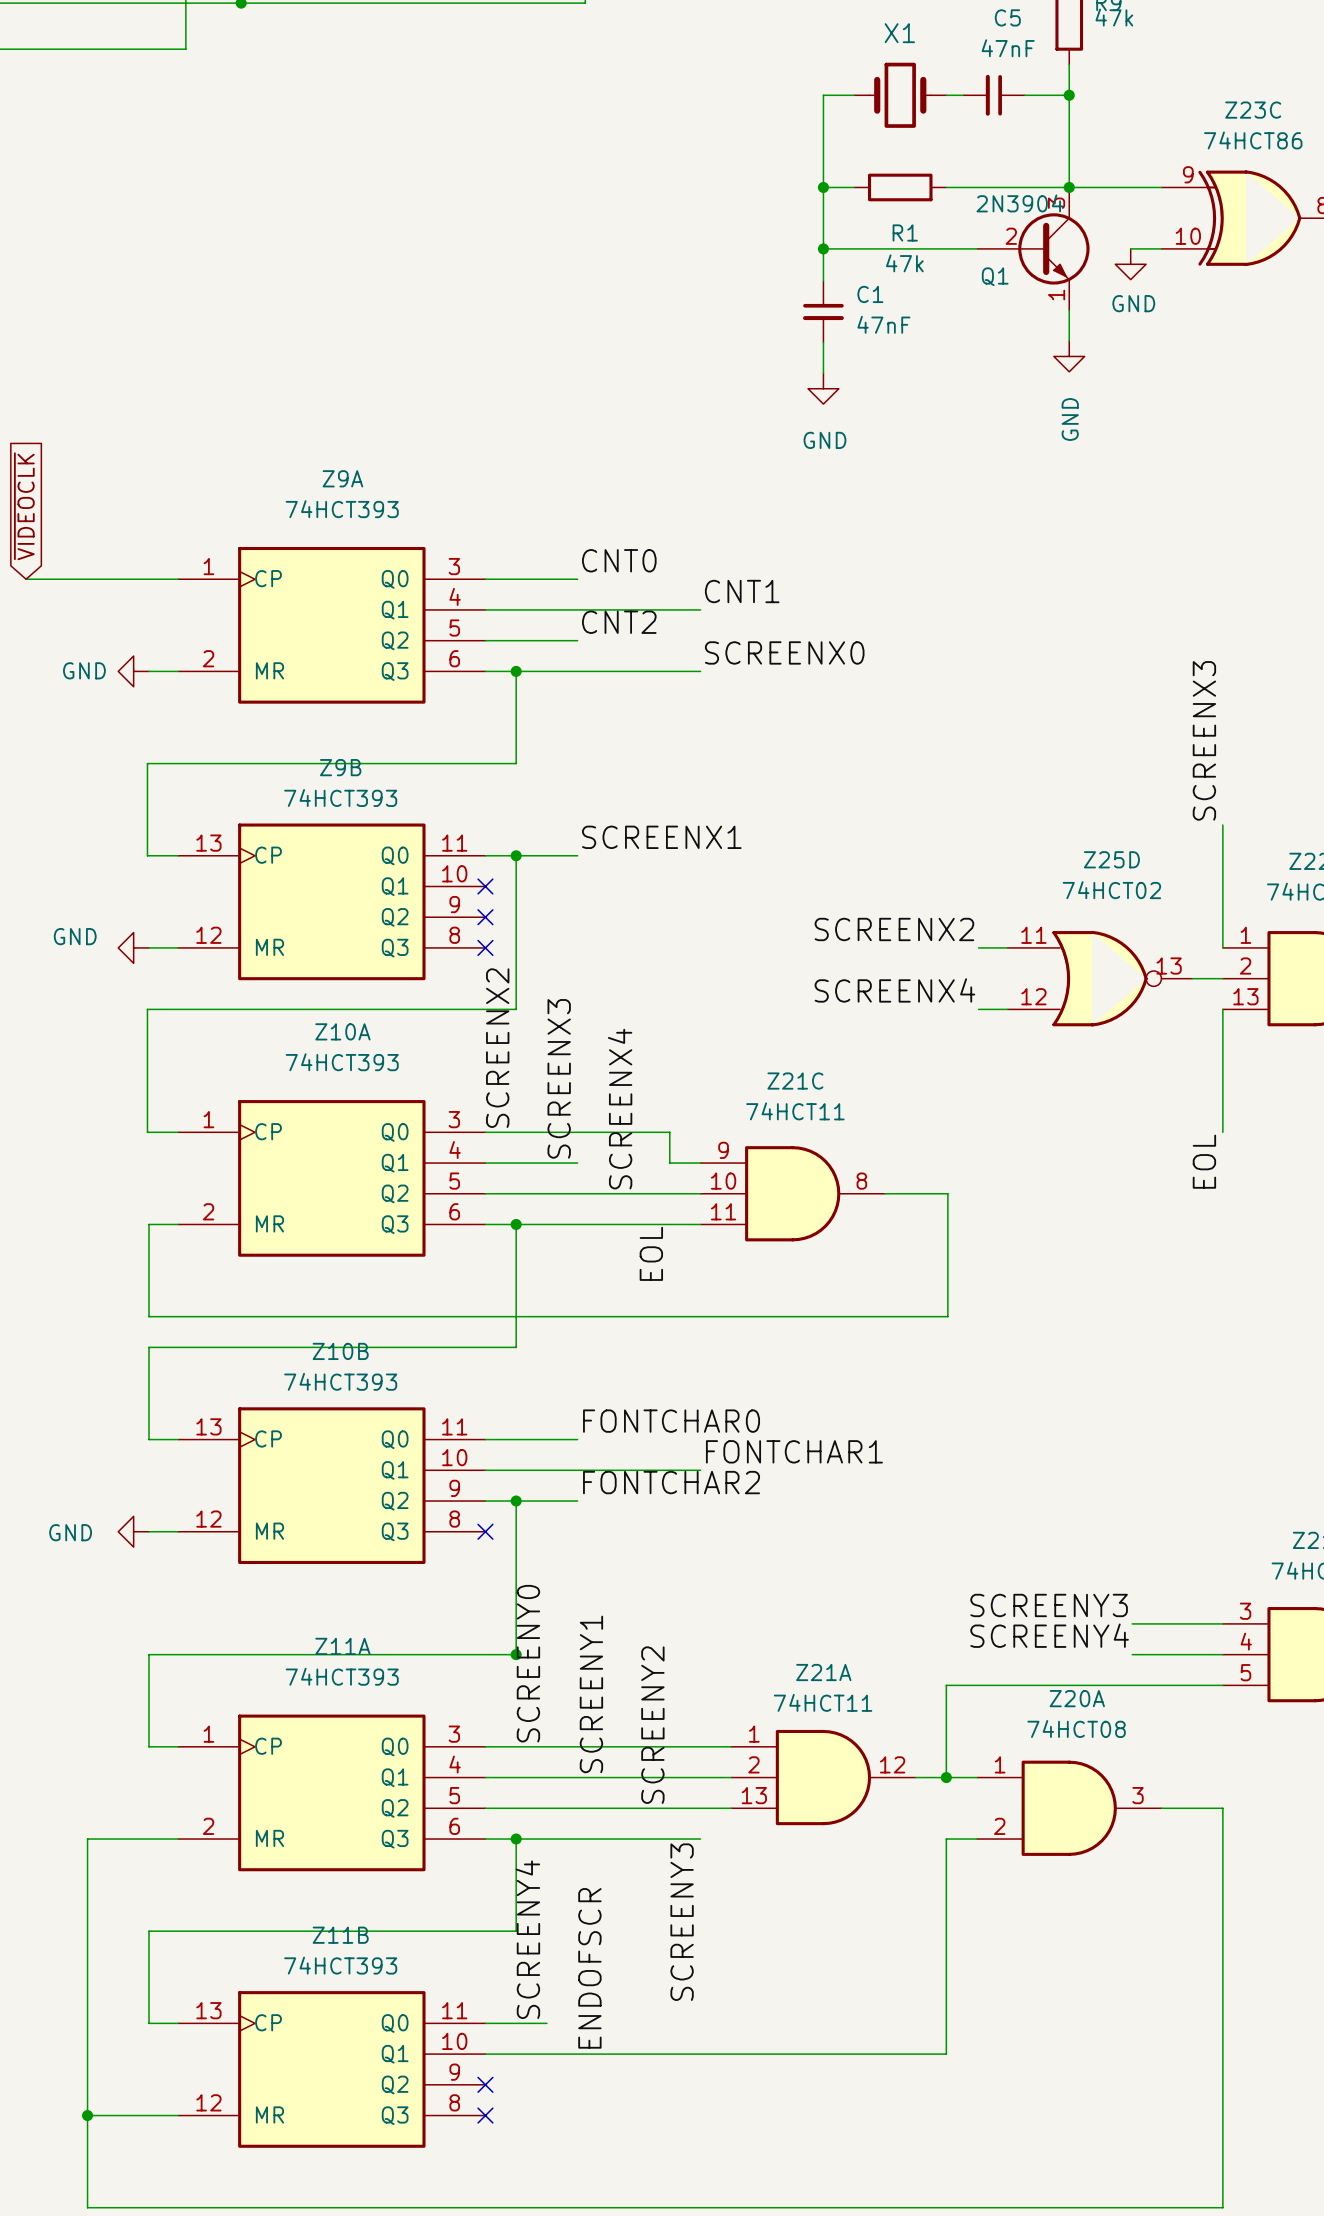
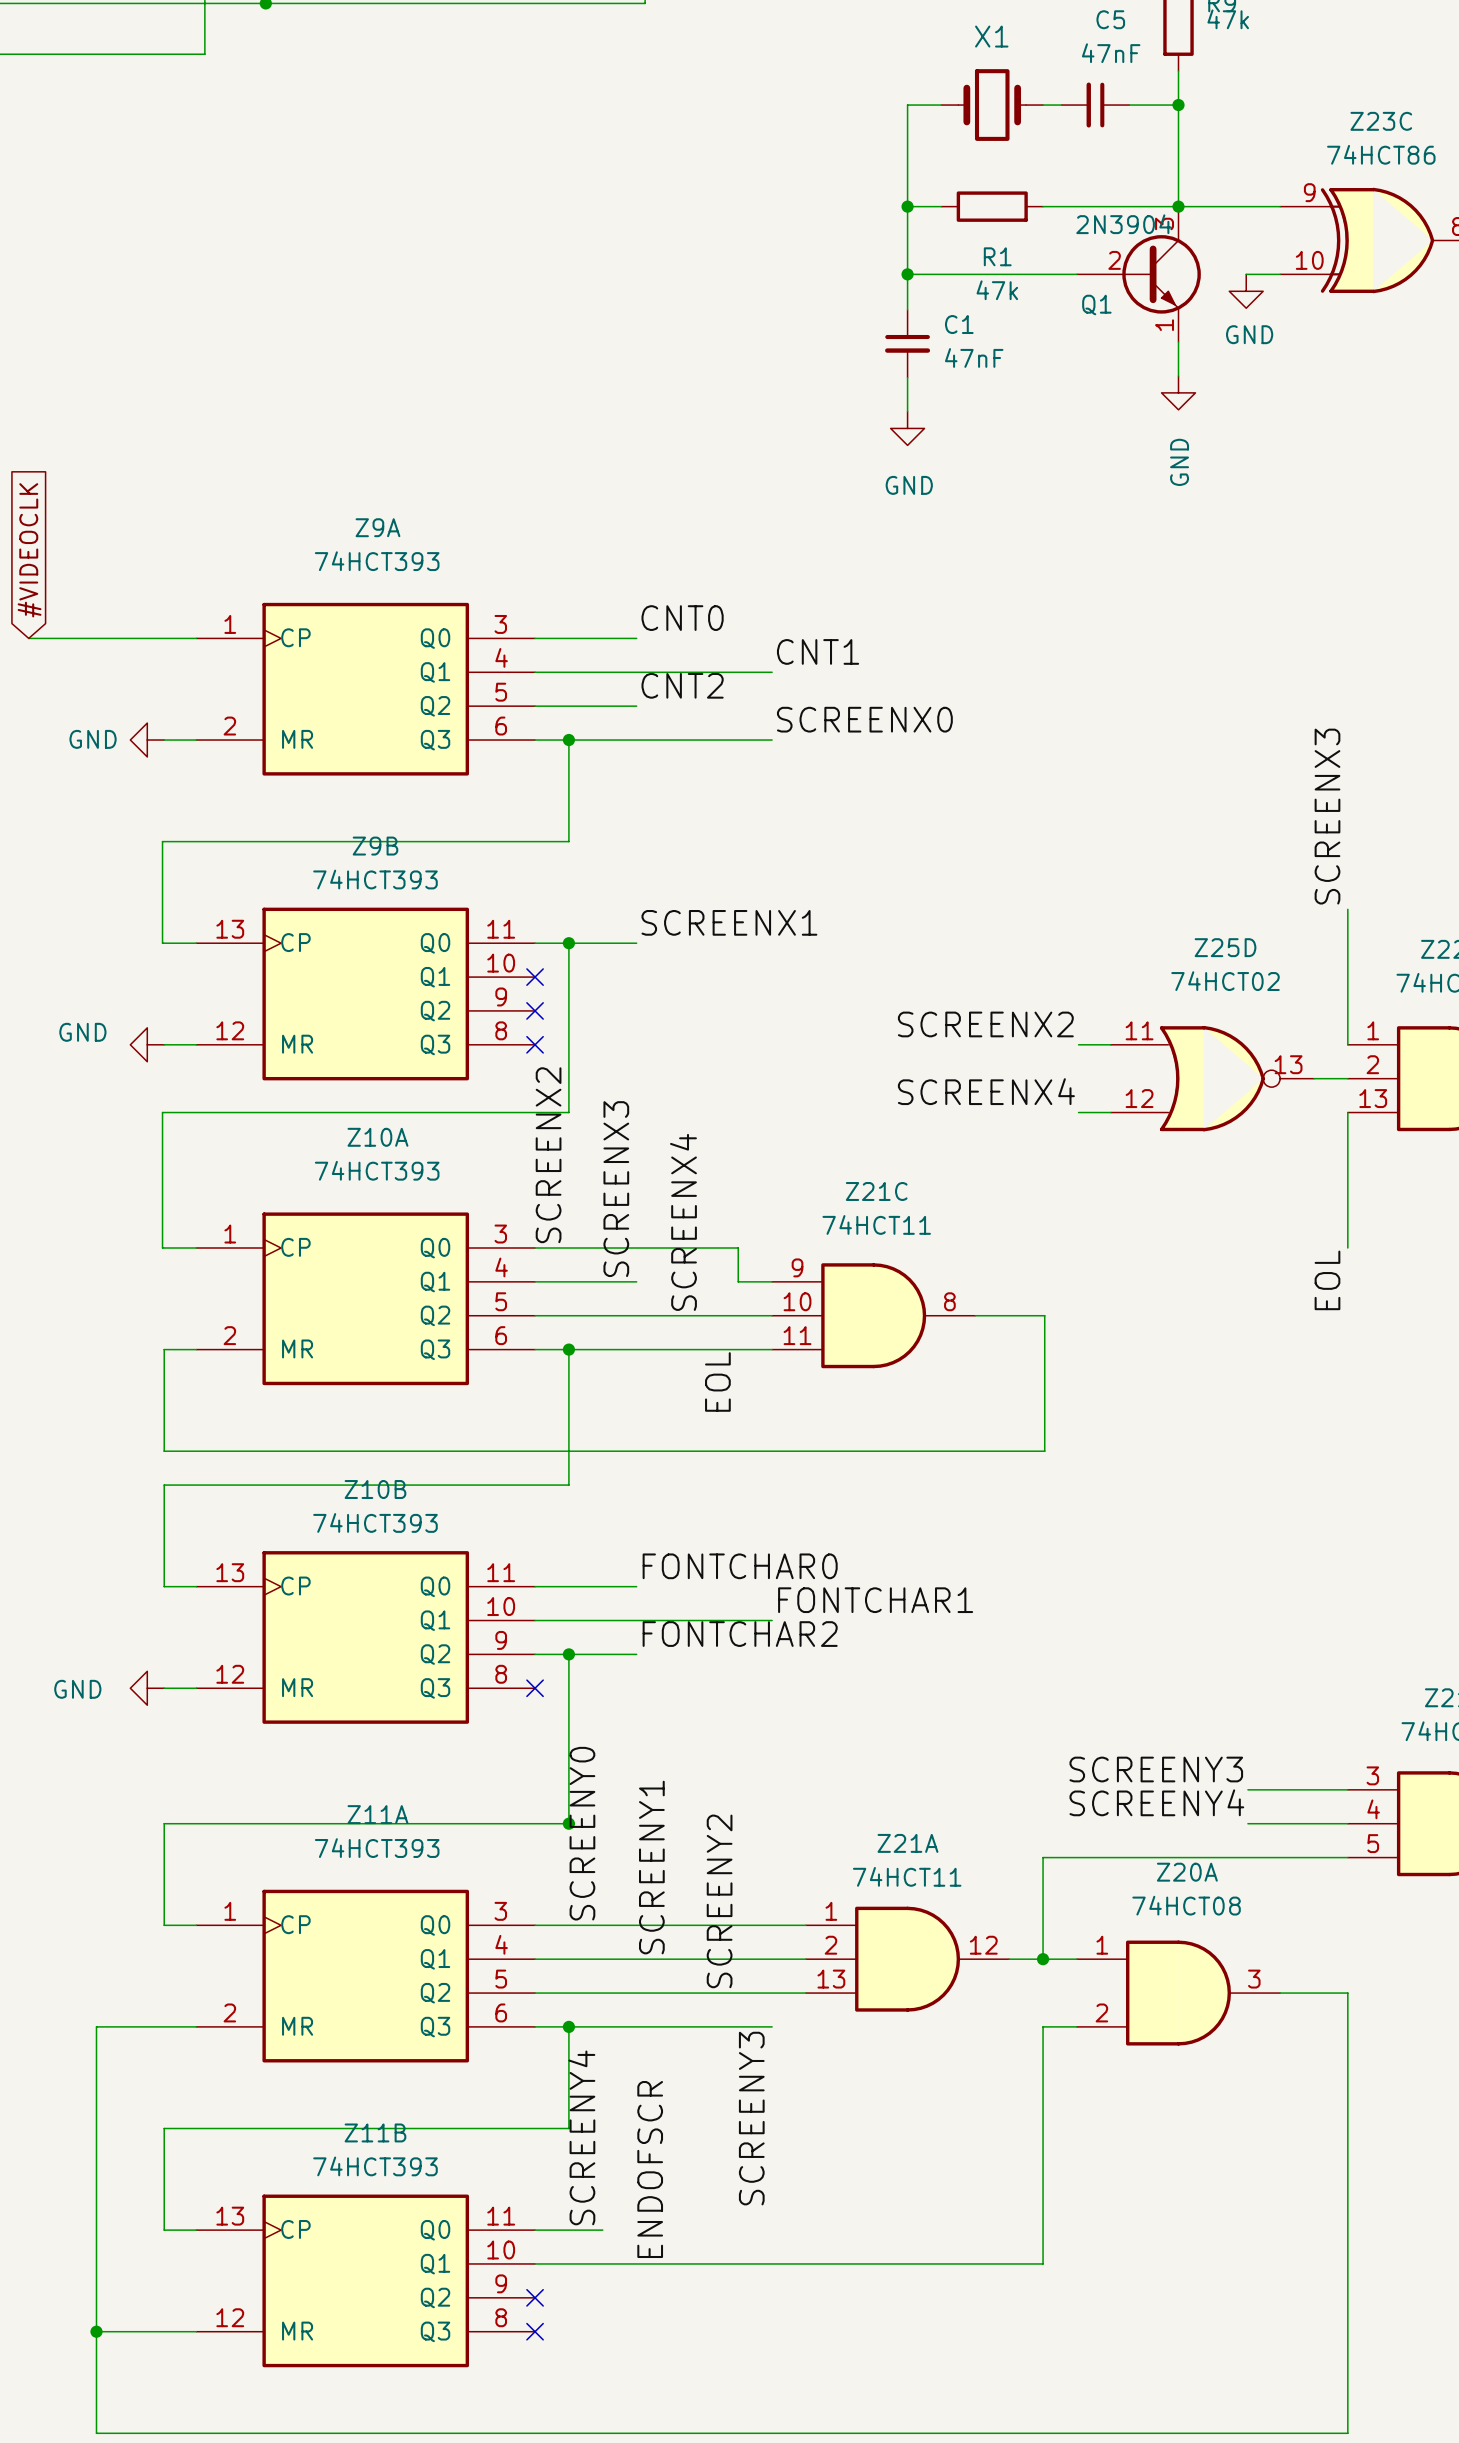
global label: ~{VIDEOCLK} (24, 506) -> #VIDEOCLK (29, 550)

